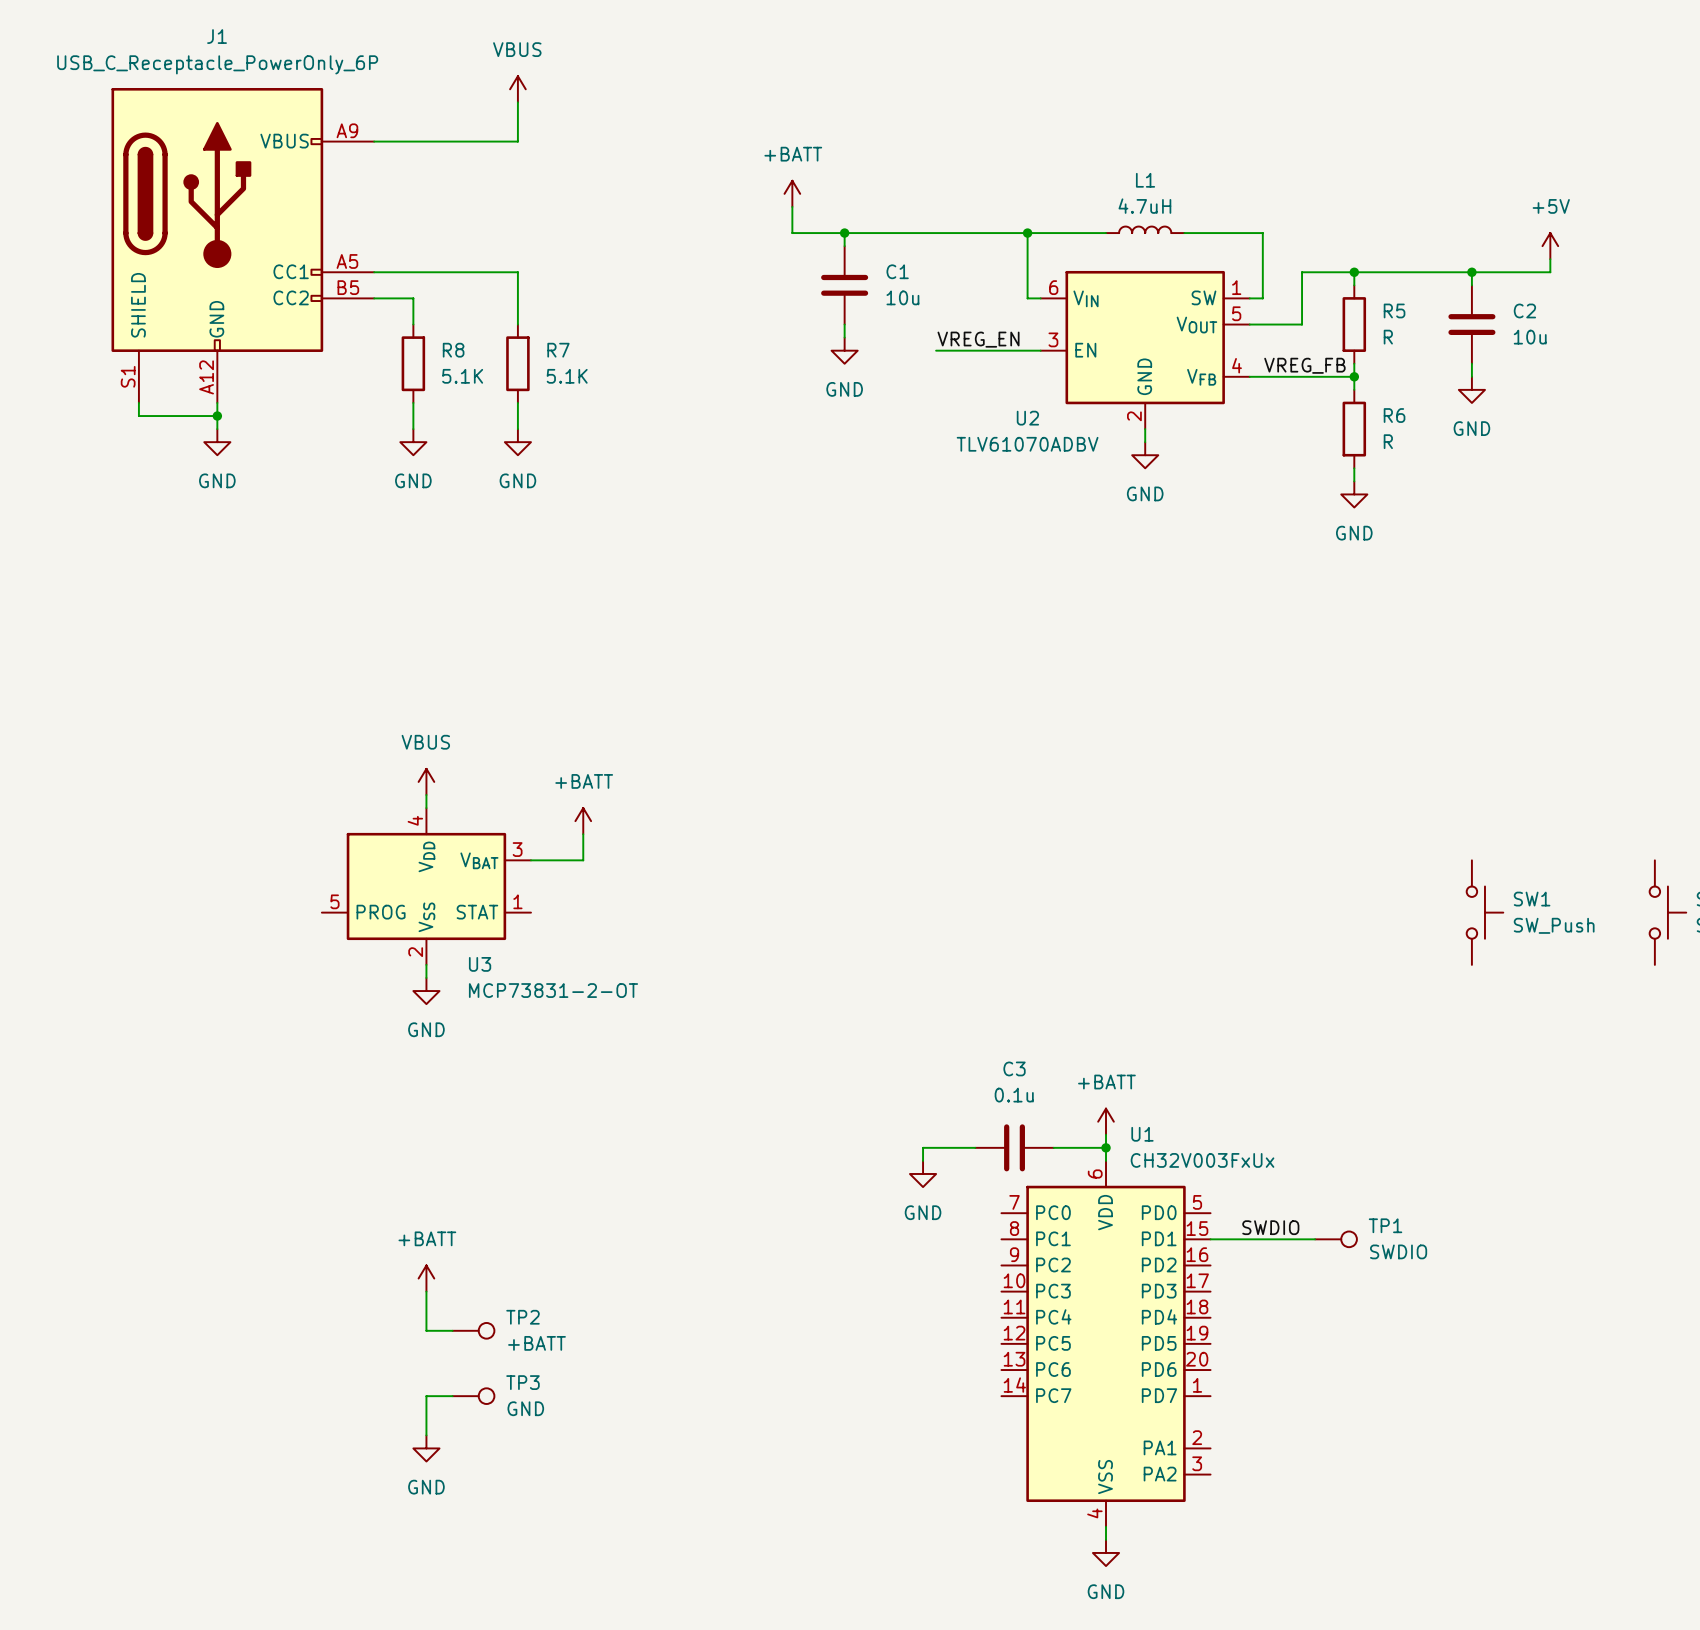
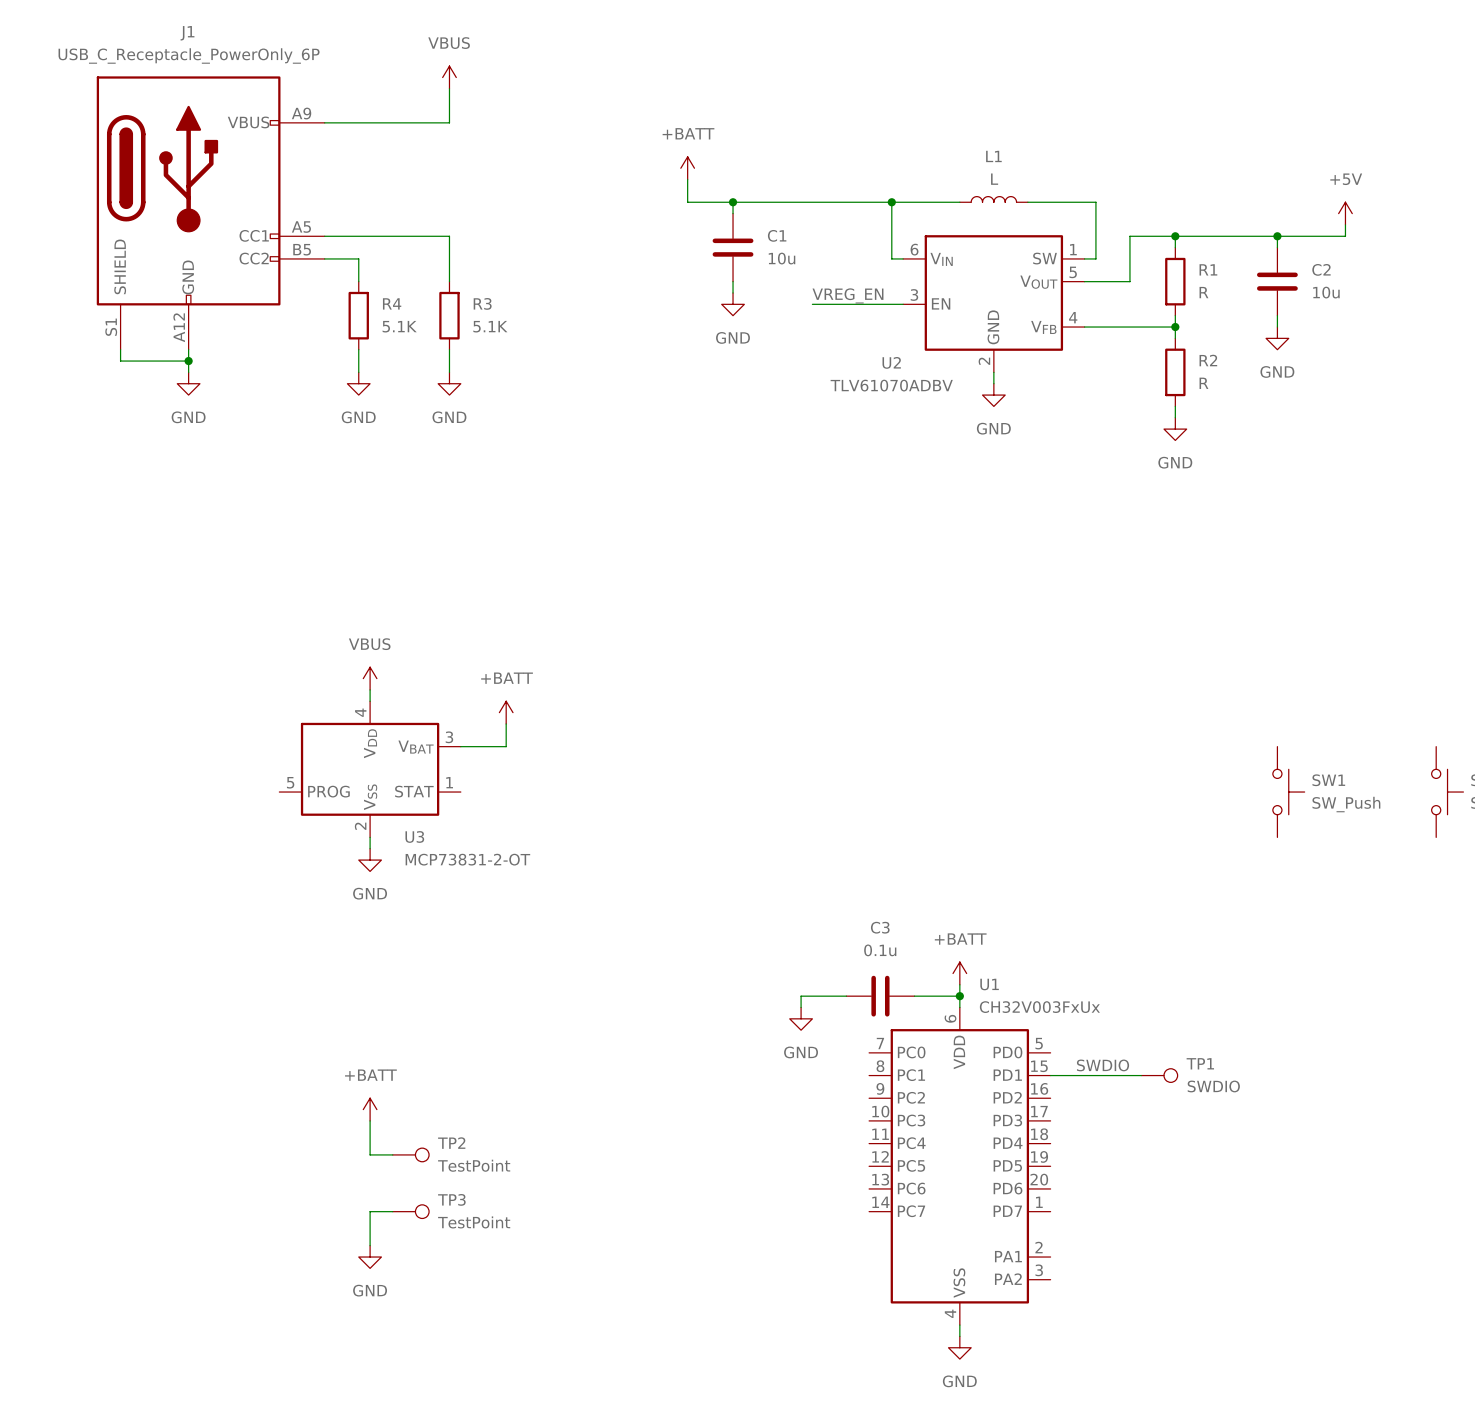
L1 value: 4.7uH (1144, 206) -> L (994, 179)
R5 name: R5 (1394, 310) -> R1 (1208, 269)
R8 name: R8 (453, 350) -> R4 (392, 303)
R7 name: R7 (558, 350) -> R3 (482, 303)
label: VREG_FB (1304, 365) -> none
R6 name: R6 (1394, 415) -> R2 (1208, 360)
TP2 value: +BATT (537, 1343) -> TestPoint (474, 1165)
TP3 value: GND (525, 1408) -> TestPoint (474, 1222)

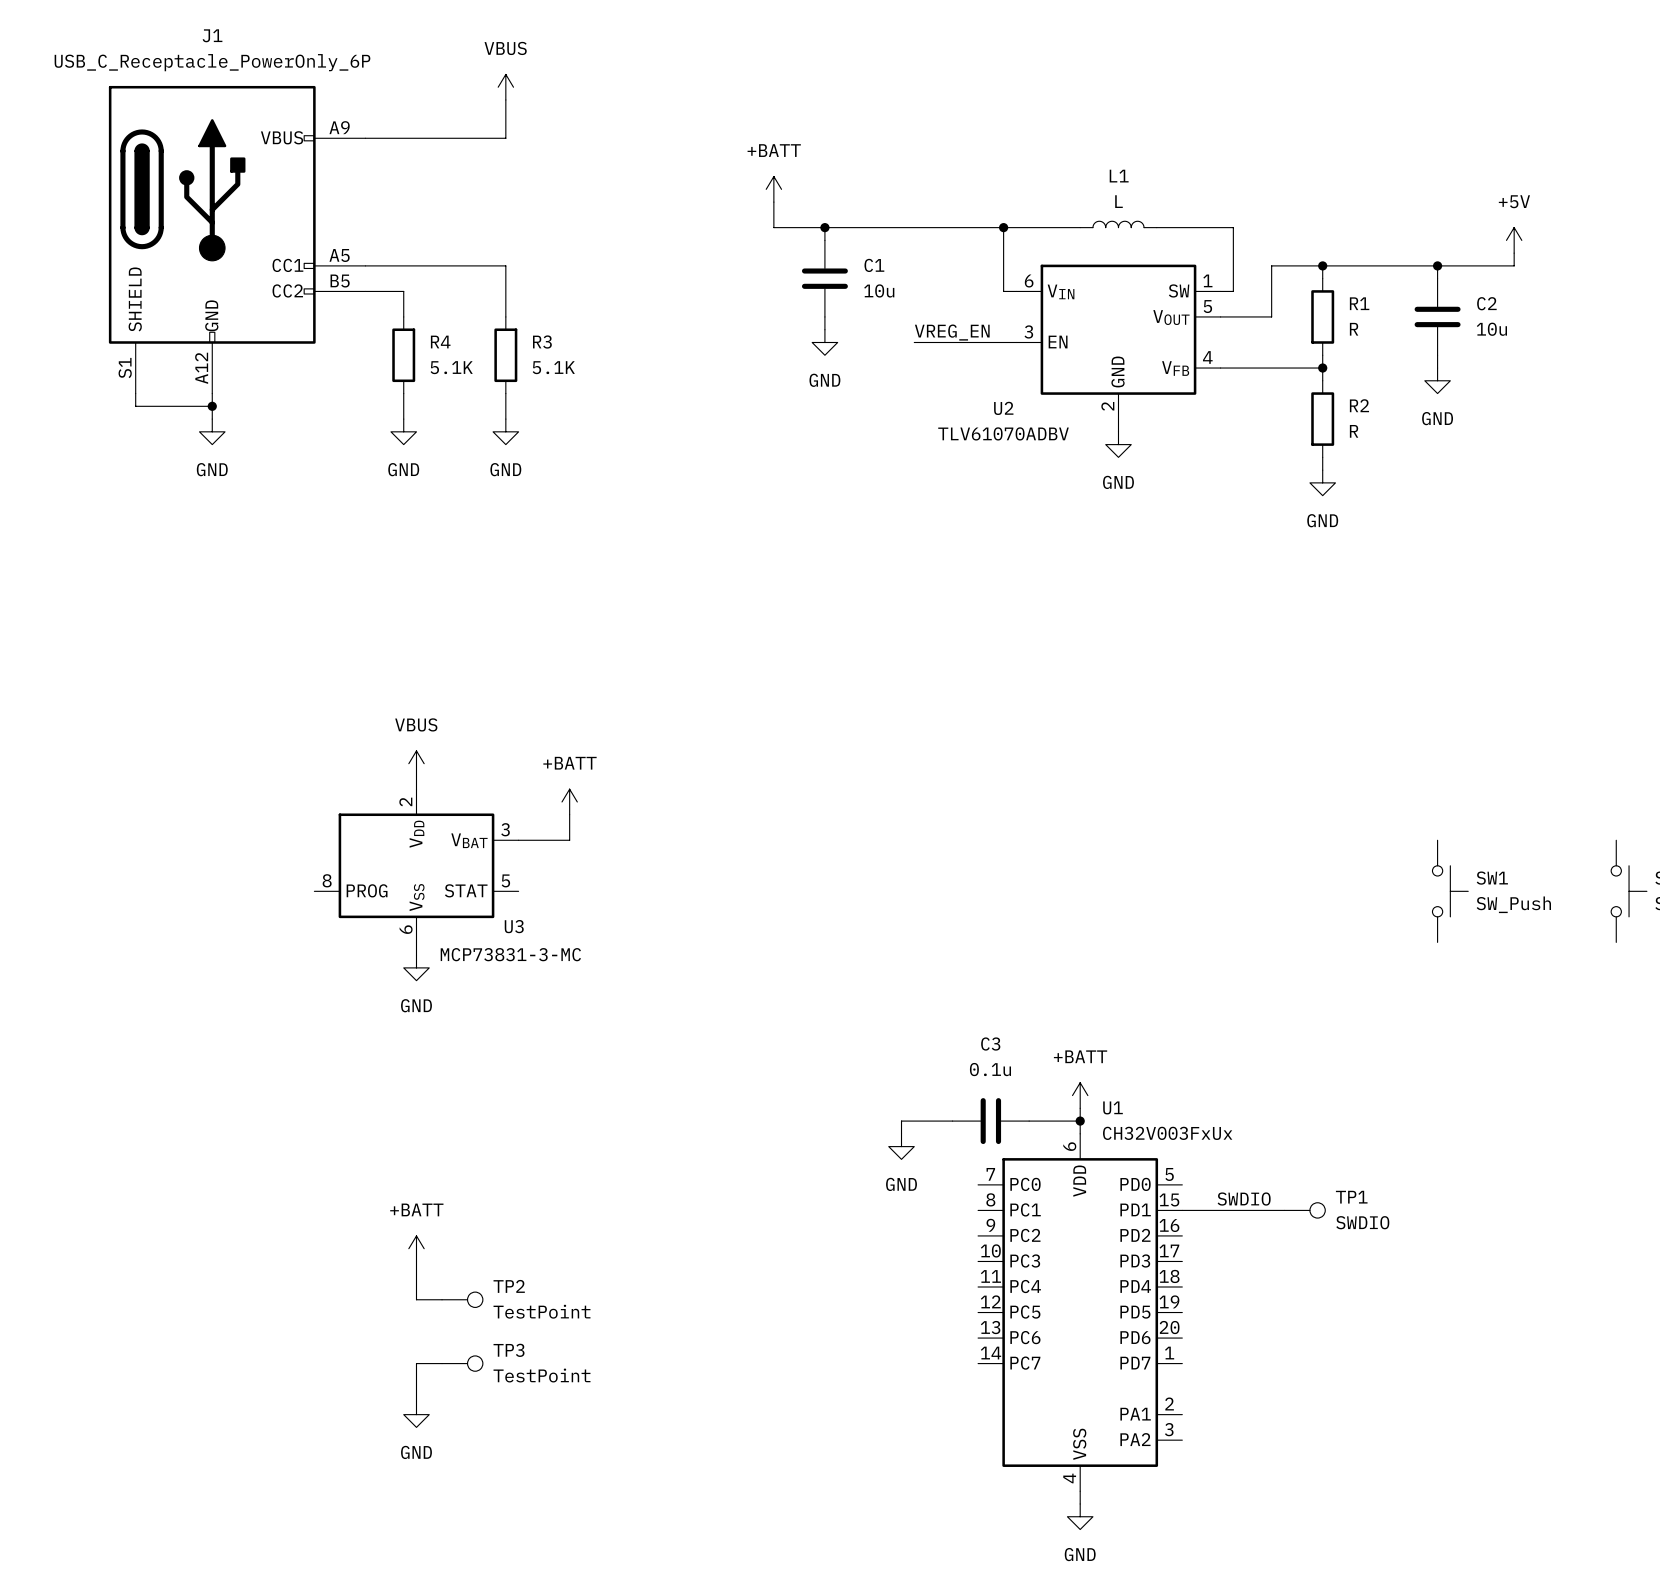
U3 pin number: 4 (360, 712) -> 2 (405, 801)
U3 pin number: 5 (290, 782) -> 8 (327, 880)
U3 pin number: 1 (449, 782) -> 5 (505, 880)
U3 pin number: 2 (360, 826) -> 6 (406, 929)
U3 name position: U3 (414, 836) -> U3 (514, 926)
U3 value: MCP73831-2-OT (467, 859) -> MCP73831-3-MC (510, 954)

